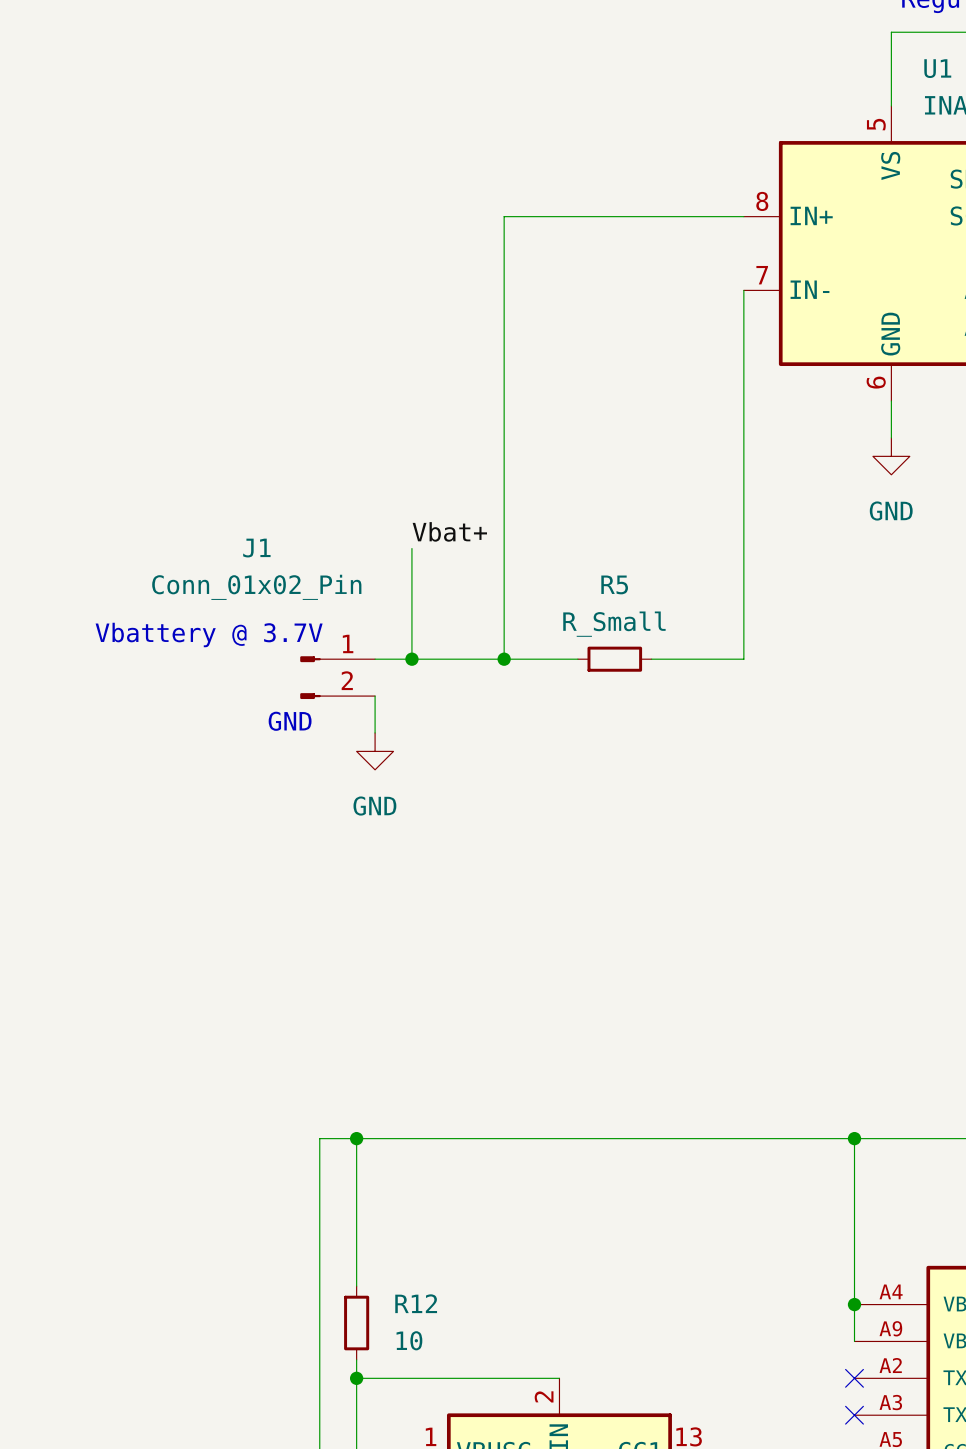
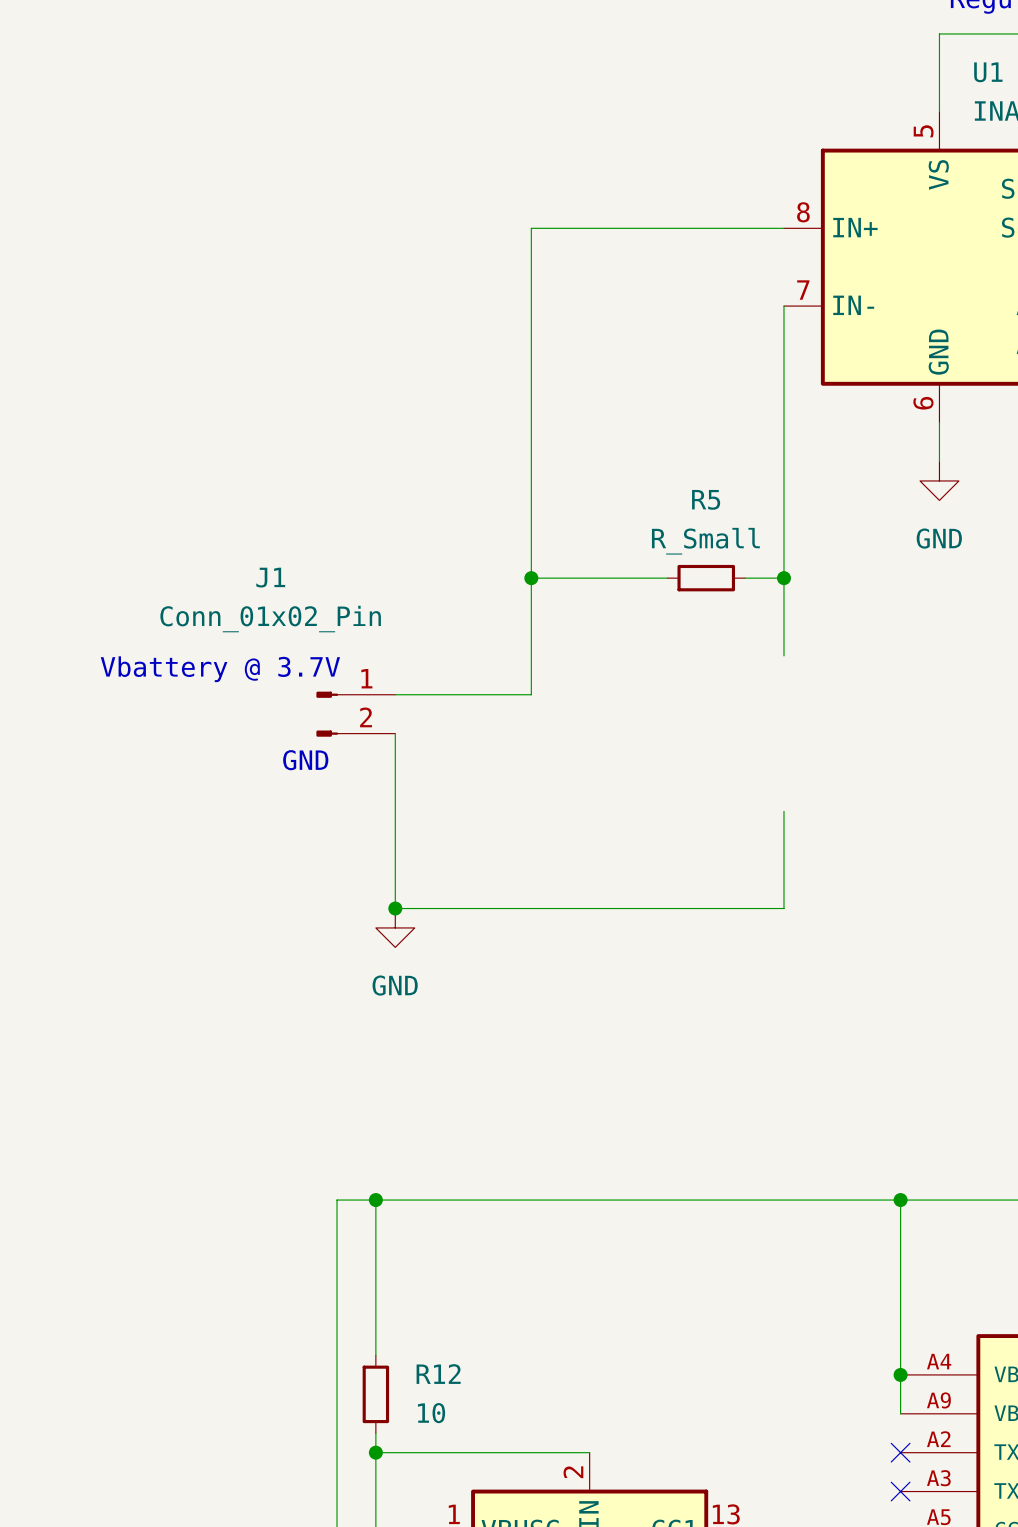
label: Vbat+ (449, 531) -> none
wire: (411, 548) (411, 659) -> none
wire: none -> (531, 578) (667, 578)
junction: none -> (531, 578)
wire: none -> (745, 578) (783, 578)
junction: none -> (783, 578)
wire: (743, 622) (743, 659) (651, 659) -> none
junction: (411, 659) -> none
wire: (504, 659) (577, 659) -> none
junction: (504, 659) -> none
R5 position: (614, 659) -> (706, 578)
wire: none -> (395, 772) (395, 908) (783, 908) (783, 811)
power symbol position: GND (375, 751) -> GND (395, 927)
junction: none -> (395, 908)

